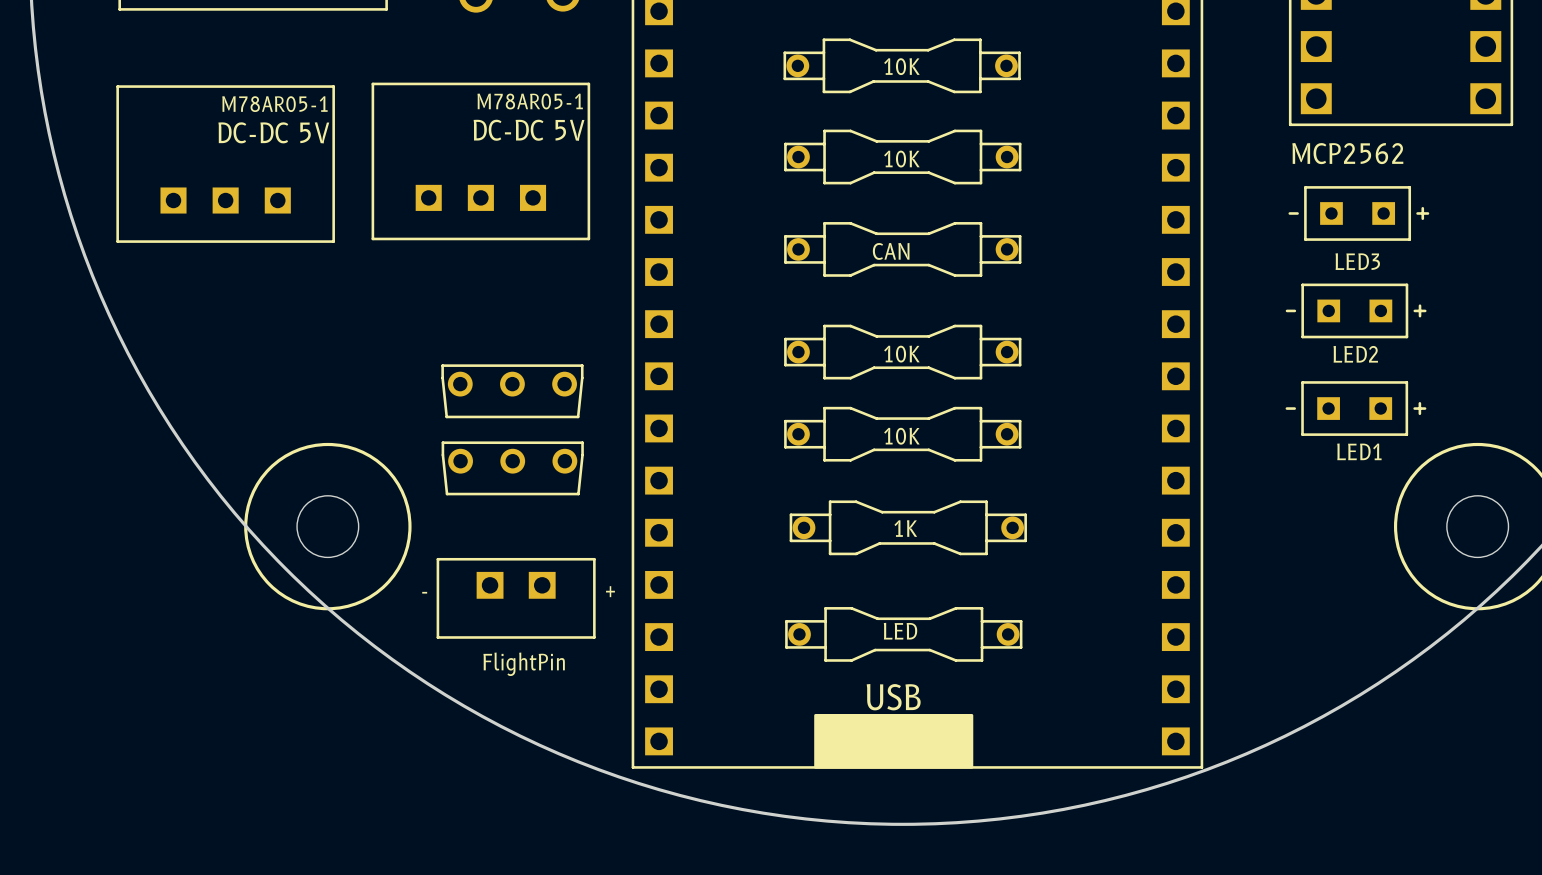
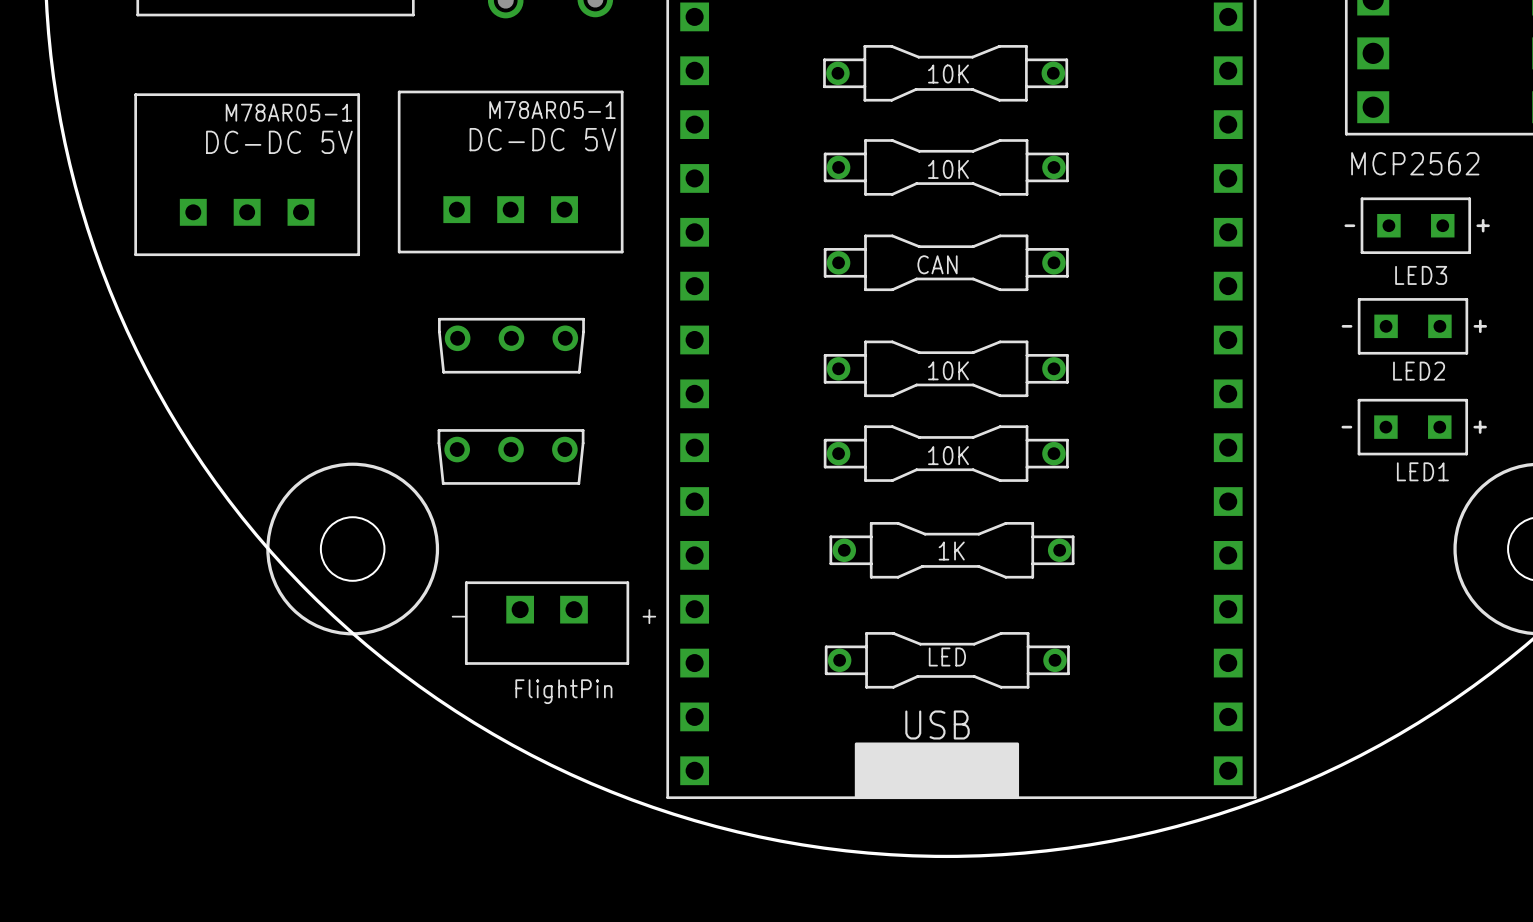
part: none -> (511, 345)
part: (512, 391) -> none
part: none -> (511, 456)
part: (512, 468) -> none

